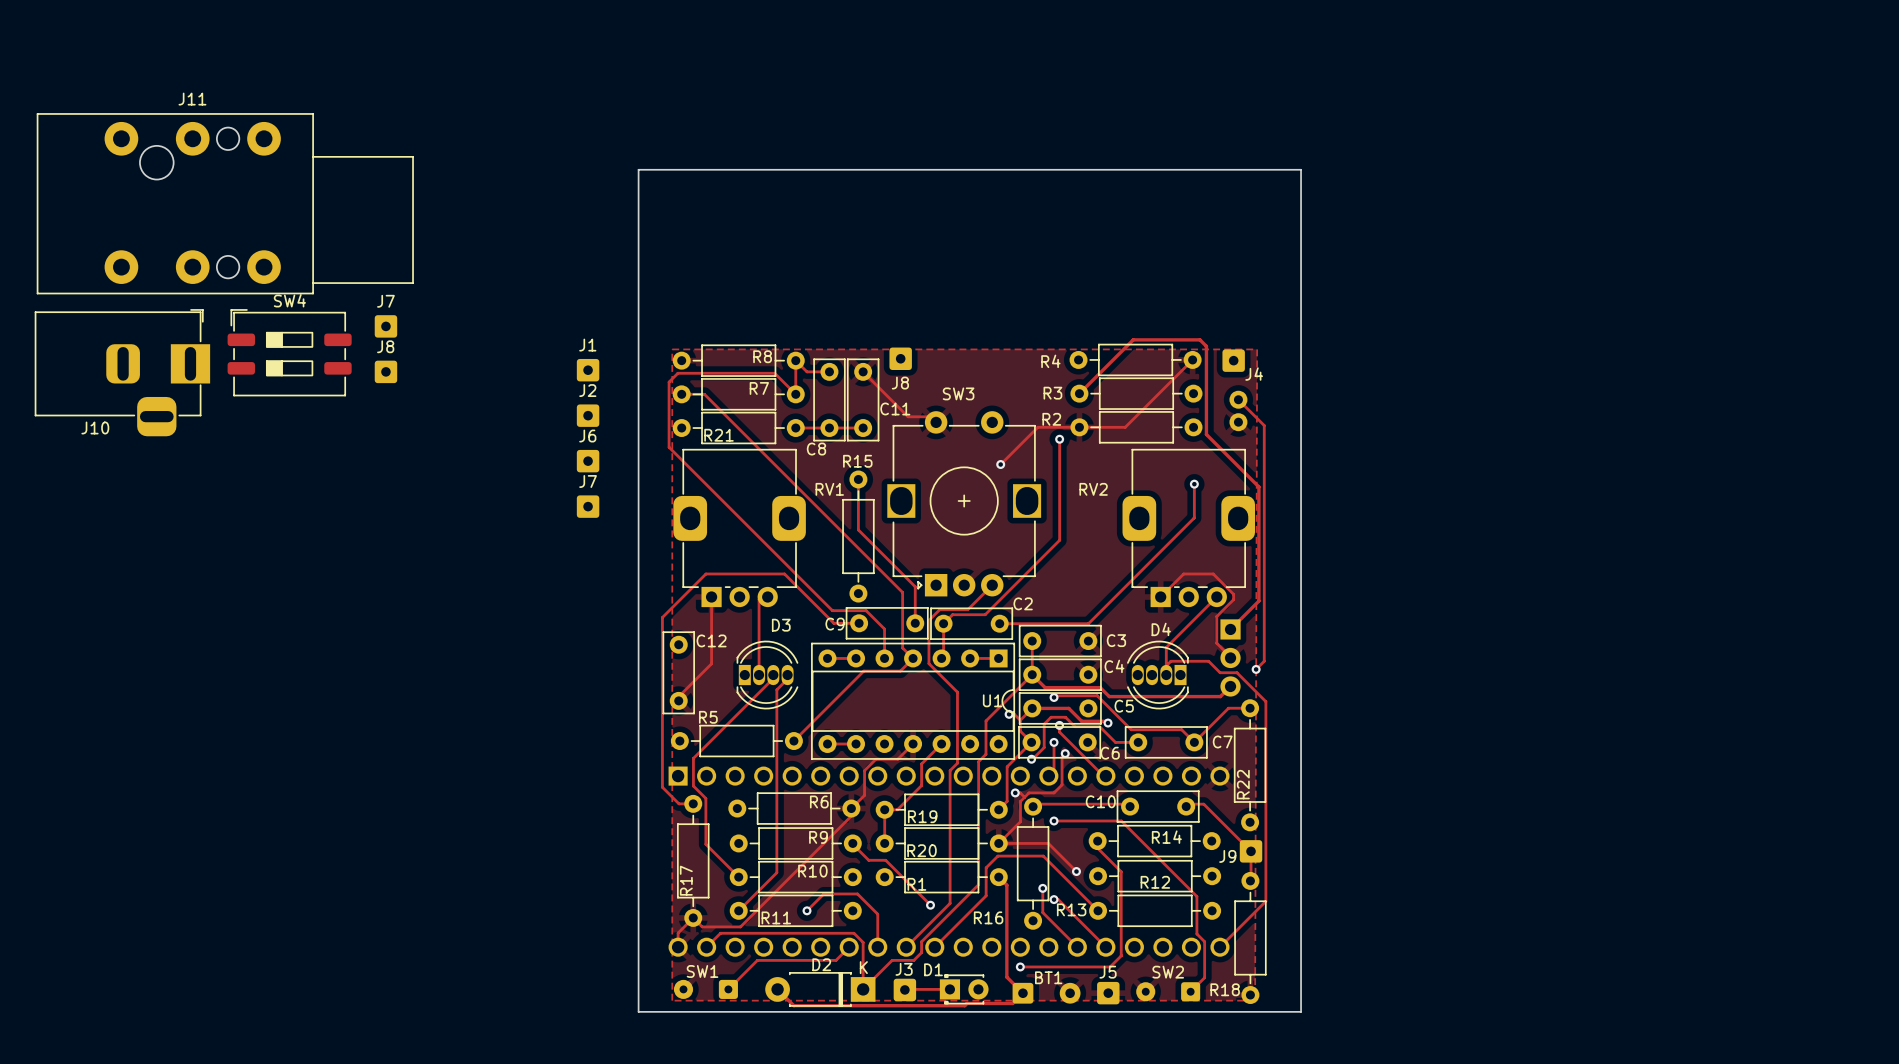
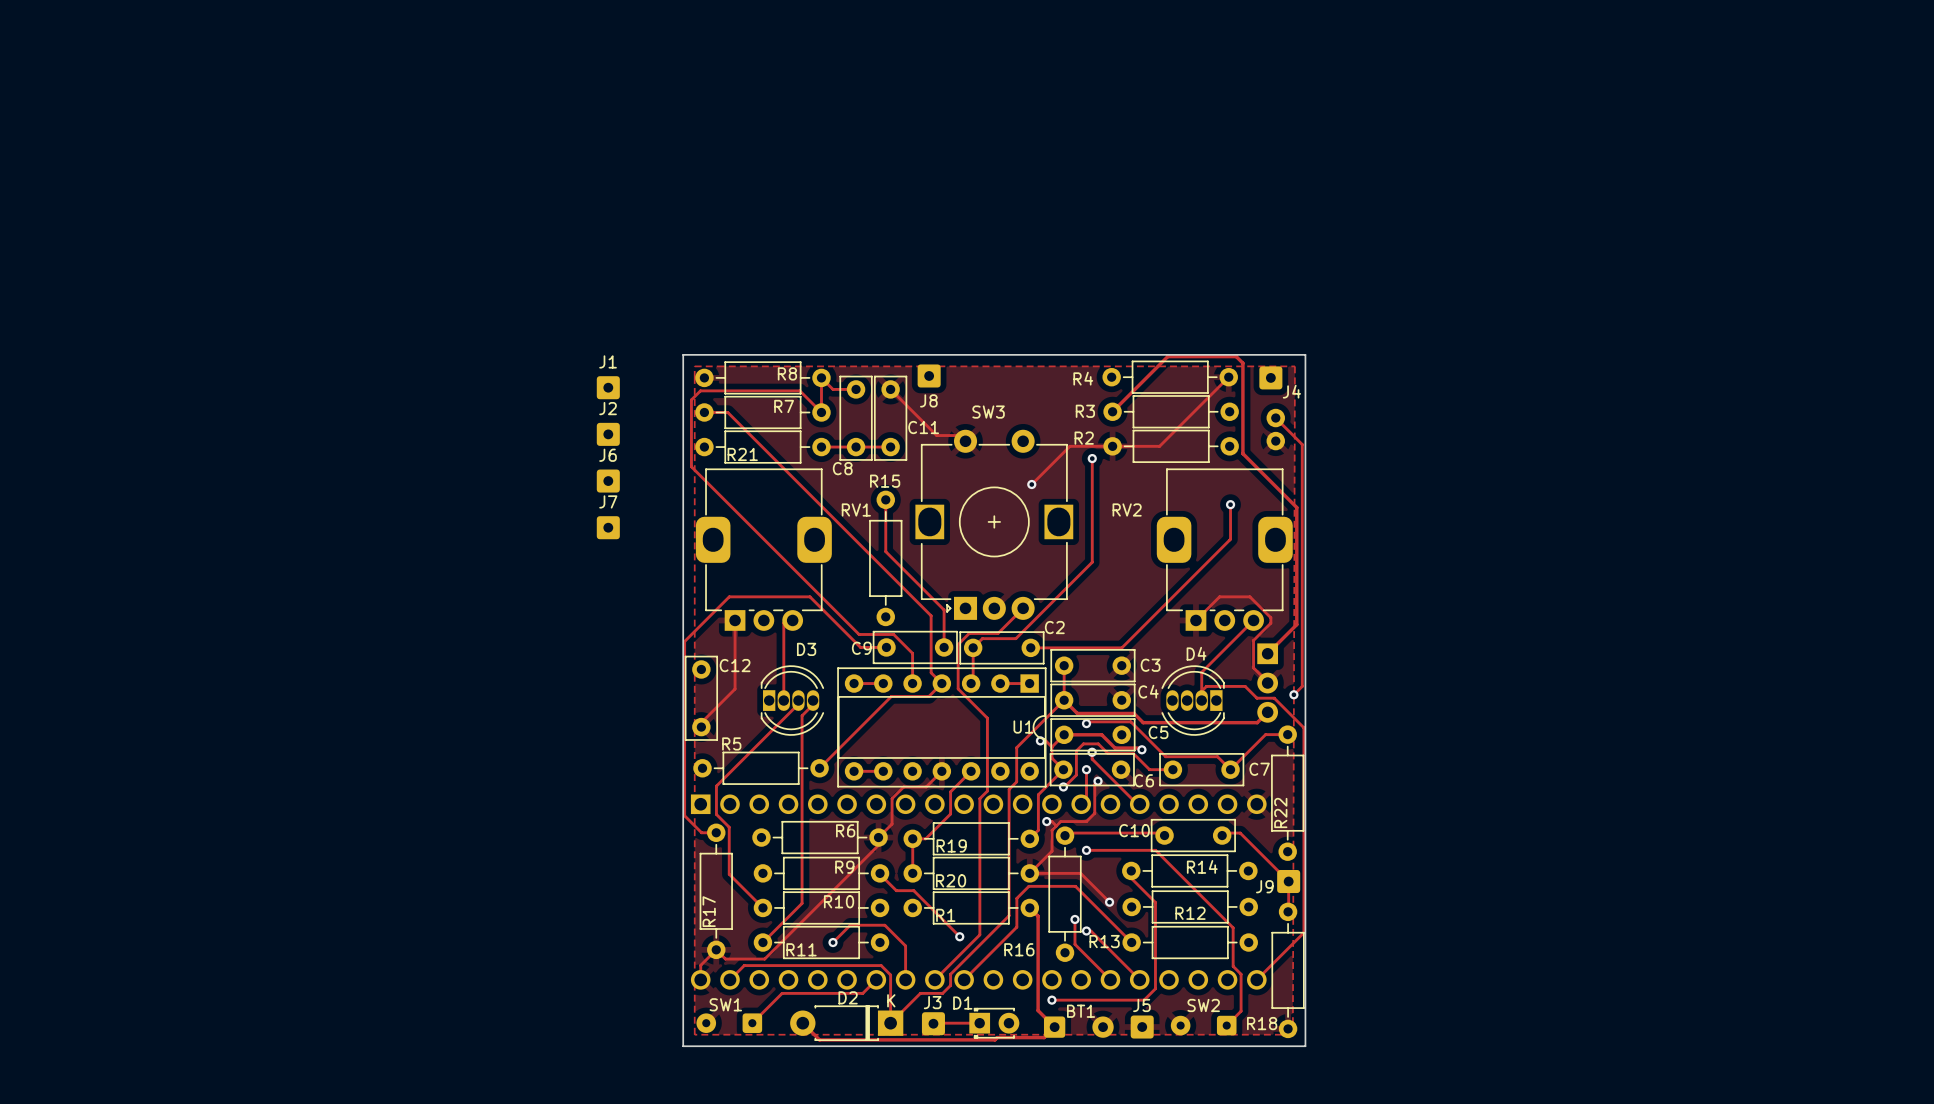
J11: (225, 203) -> none
J7: (385, 326) -> none
SW4: (289, 352) -> none
J8: (385, 371) -> none
J10: (122, 372) -> none
board edge: (661, 1011) (638, 1011) (638, 169) (1301, 169) (1301, 1011) (1267, 1011) -> (683, 1046) (683, 354) (1305, 354) (1305, 1046)

